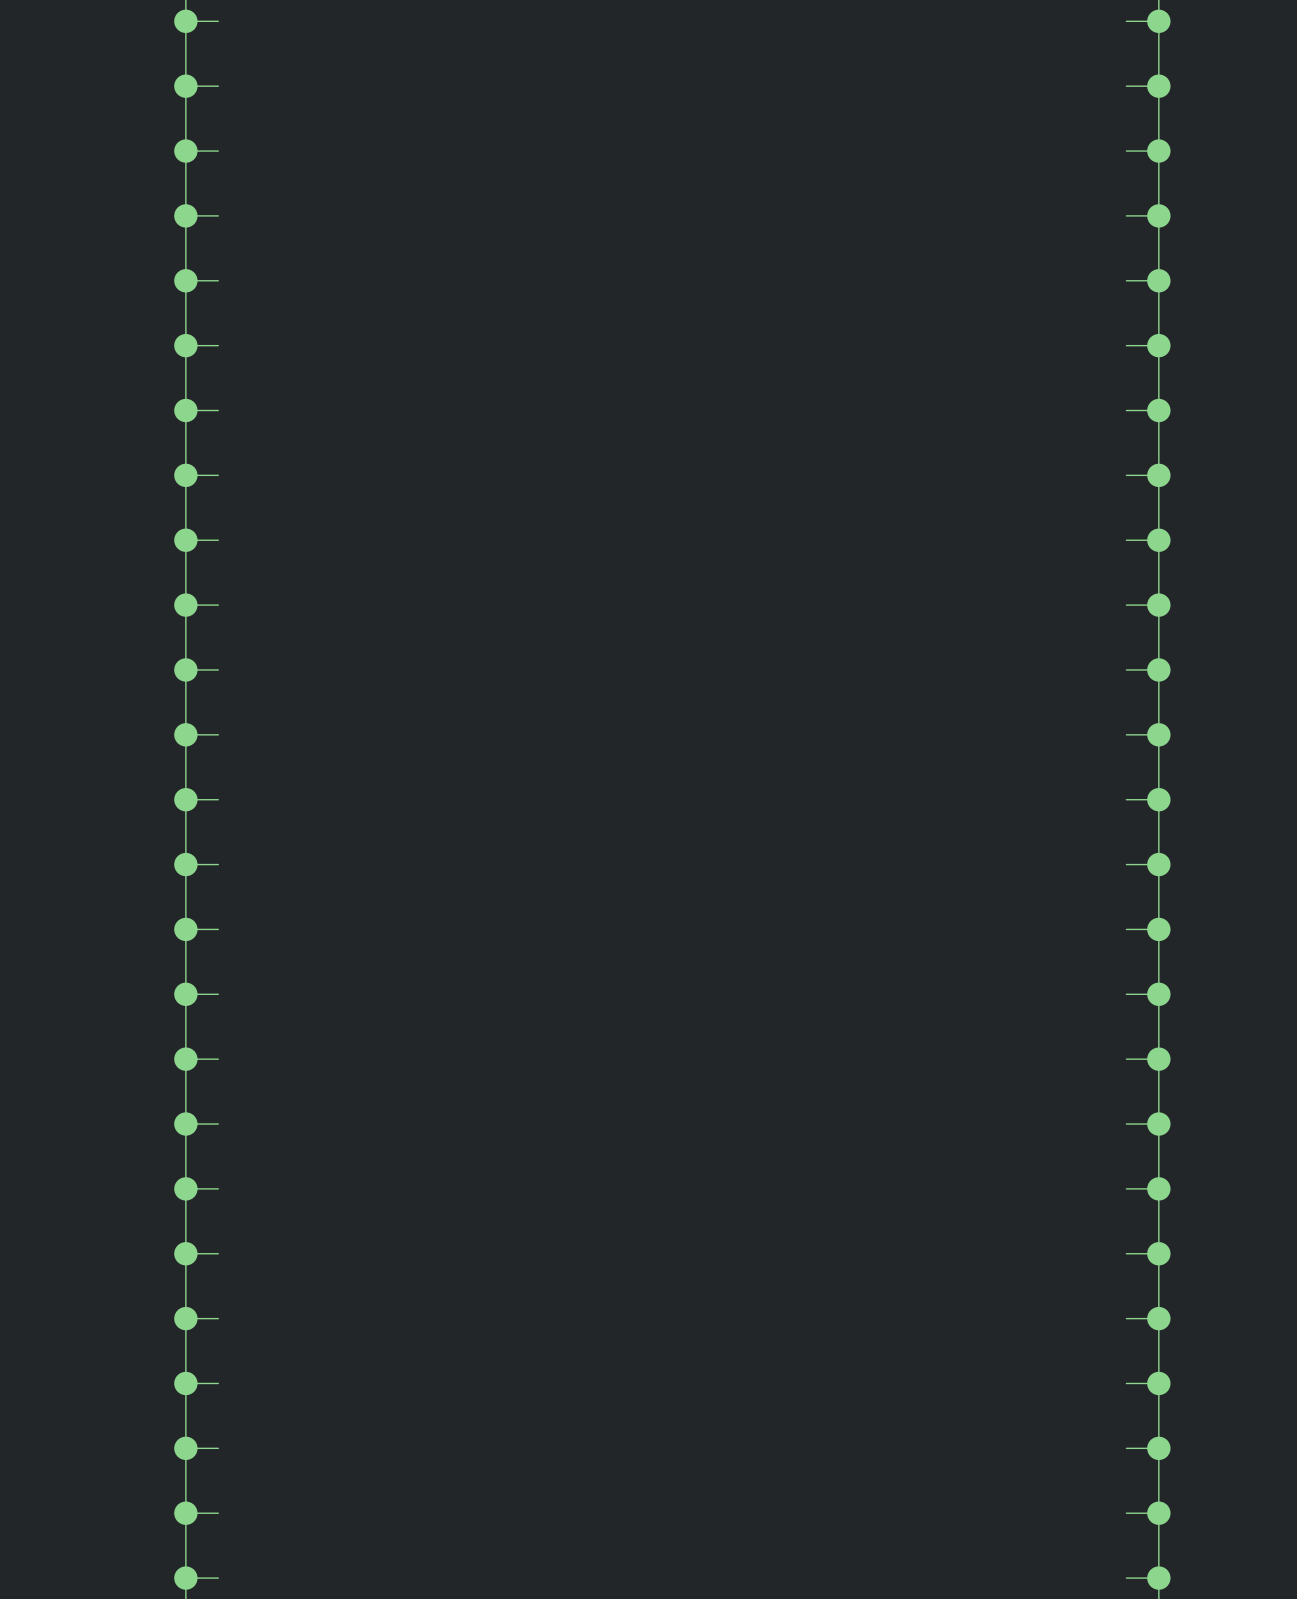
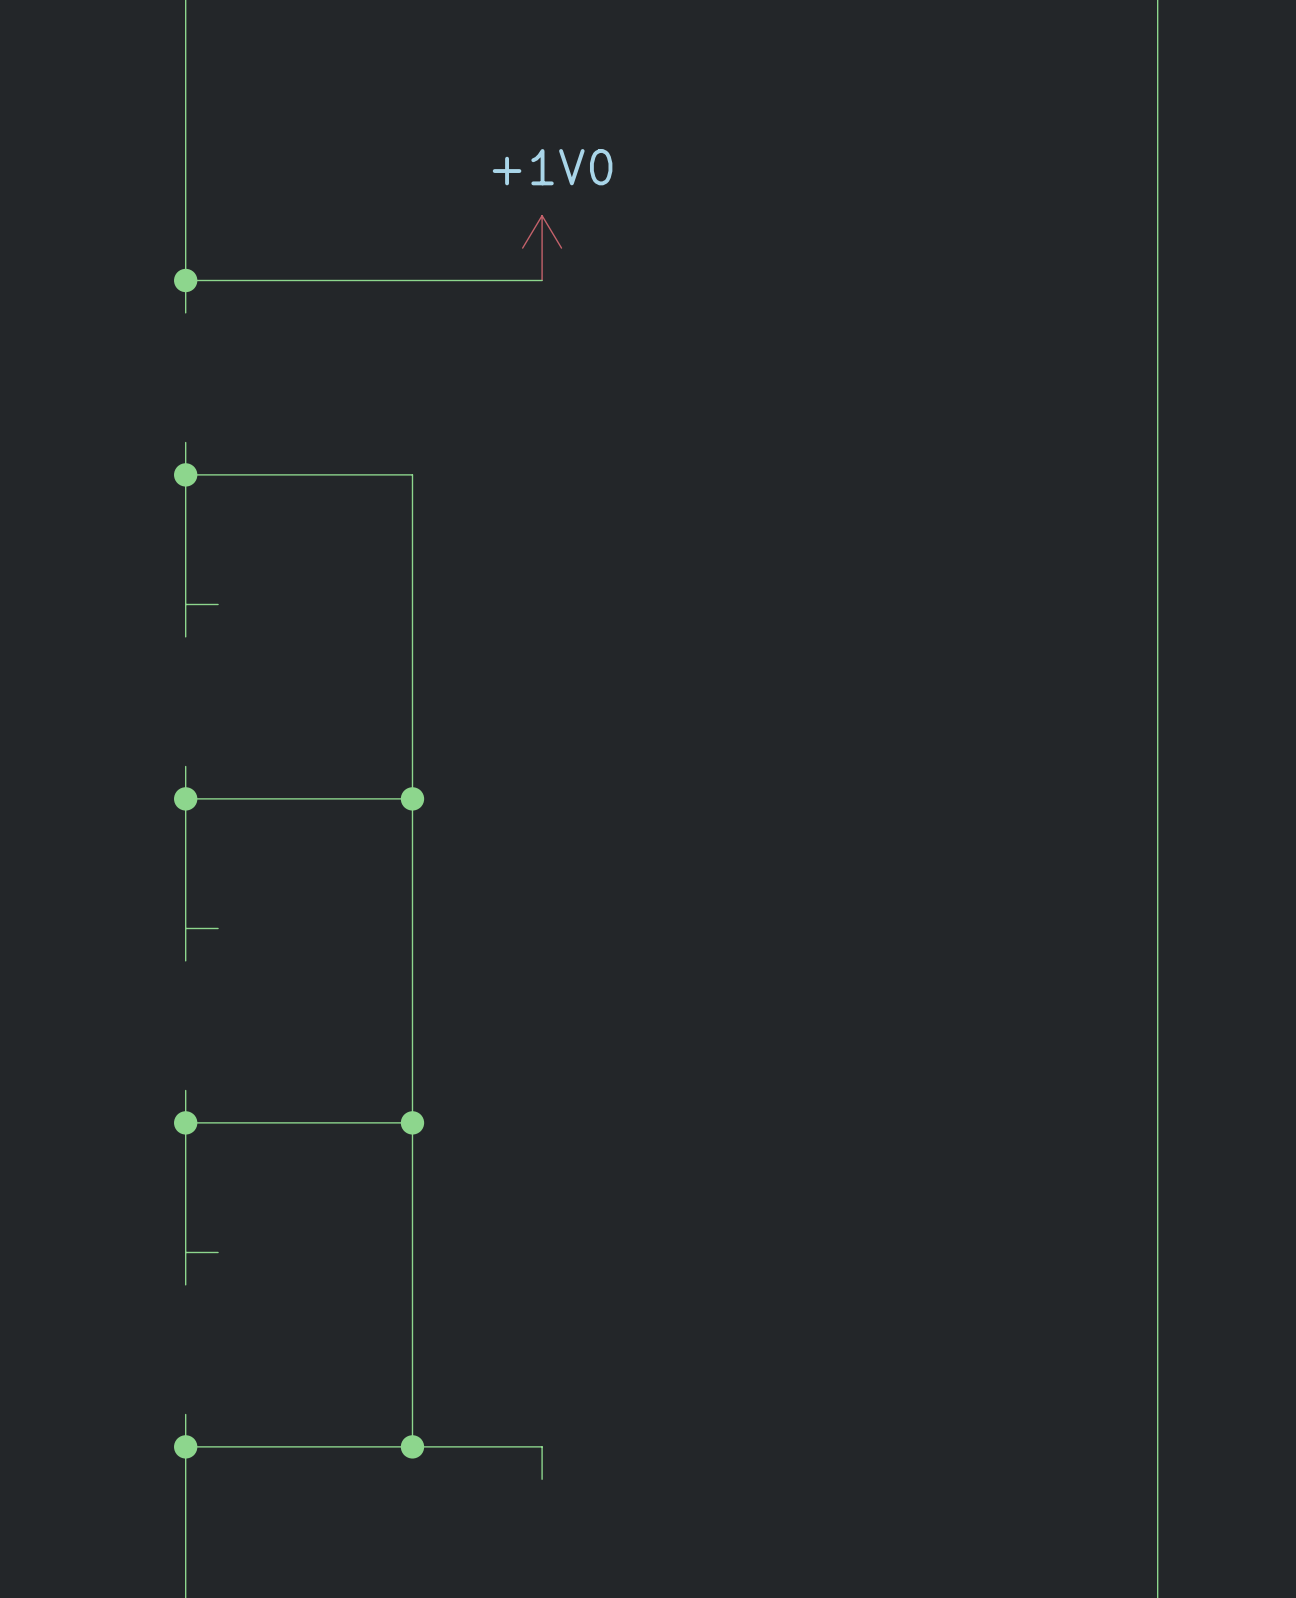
wire: (185, 21) (218, 21) -> none
junction: (185, 21) -> none
wire: (1126, 21) (1158, 21) -> none
junction: (1158, 21) -> none
wire: (185, 86) (218, 86) -> none
junction: (185, 86) -> none
wire: (1126, 86) (1158, 86) -> none
junction: (1158, 86) -> none
wire: (185, 151) (218, 151) -> none
junction: (185, 151) -> none
wire: (1126, 151) (1158, 151) -> none
junction: (1158, 151) -> none
wire: (185, 215) (218, 215) -> none
junction: (185, 215) -> none
wire: (1126, 215) (1158, 215) -> none
junction: (1158, 215) -> none
power symbol: none -> +1V0 (542, 248)
wire: none -> (218, 280) (542, 280)
wire: (1126, 280) (1158, 280) -> none
junction: (1158, 280) -> none
wire: (185, 313) (185, 442) -> none
wire: (185, 345) (218, 345) -> none
junction: (185, 345) -> none
wire: (1126, 345) (1158, 345) -> none
junction: (1158, 345) -> none
wire: (185, 410) (218, 410) -> none
junction: (185, 410) -> none
wire: (1126, 410) (1158, 410) -> none
junction: (1158, 410) -> none
wire: none -> (218, 474) (412, 474) (412, 1446)
wire: (1126, 475) (1158, 475) -> none
junction: (1158, 475) -> none
wire: (185, 540) (218, 540) -> none
junction: (185, 540) -> none
wire: (1126, 540) (1158, 540) -> none
junction: (1158, 540) -> none
junction: (185, 605) -> none
wire: (1126, 605) (1158, 605) -> none
junction: (1158, 605) -> none
wire: (185, 637) (185, 767) -> none
wire: (185, 669) (218, 669) -> none
junction: (185, 669) -> none
wire: (1126, 669) (1158, 669) -> none
junction: (1158, 669) -> none
wire: (185, 734) (218, 734) -> none
junction: (185, 734) -> none
wire: (1126, 734) (1158, 734) -> none
junction: (1158, 734) -> none
wire: none -> (218, 798) (412, 798)
junction: none -> (412, 798)
wire: (1126, 799) (1158, 799) -> none
junction: (1158, 799) -> none
wire: (185, 864) (218, 864) -> none
junction: (185, 864) -> none
wire: (1126, 864) (1158, 864) -> none
junction: (1158, 864) -> none
junction: (185, 929) -> none
wire: (1126, 929) (1158, 929) -> none
junction: (1158, 929) -> none
wire: (185, 961) (185, 1091) -> none
wire: (185, 994) (218, 994) -> none
junction: (185, 994) -> none
wire: (1126, 994) (1158, 994) -> none
junction: (1158, 994) -> none
wire: (185, 1059) (218, 1059) -> none
junction: (185, 1059) -> none
wire: (1126, 1059) (1158, 1059) -> none
junction: (1158, 1059) -> none
wire: none -> (218, 1122) (412, 1122)
junction: none -> (412, 1122)
wire: (1126, 1124) (1158, 1124) -> none
junction: (1158, 1124) -> none
wire: (185, 1188) (218, 1188) -> none
junction: (185, 1188) -> none
wire: (1126, 1188) (1158, 1188) -> none
junction: (1158, 1188) -> none
junction: (185, 1253) -> none
wire: (1126, 1253) (1158, 1253) -> none
junction: (1158, 1253) -> none
wire: (185, 1286) (185, 1415) -> none
wire: (185, 1318) (218, 1318) -> none
junction: (185, 1318) -> none
wire: (1126, 1318) (1158, 1318) -> none
junction: (1158, 1318) -> none
wire: (185, 1383) (218, 1383) -> none
junction: (185, 1383) -> none
wire: (1126, 1383) (1158, 1383) -> none
junction: (1158, 1383) -> none
wire: none -> (218, 1446) (542, 1446) (542, 1479)
junction: none -> (412, 1446)
wire: (1126, 1448) (1158, 1448) -> none
junction: (1158, 1448) -> none
wire: (185, 1513) (218, 1513) -> none
junction: (185, 1513) -> none
wire: (1126, 1513) (1158, 1513) -> none
junction: (1158, 1513) -> none
wire: (185, 1578) (218, 1578) -> none
junction: (185, 1578) -> none
wire: (1126, 1578) (1158, 1578) -> none
junction: (1158, 1578) -> none

